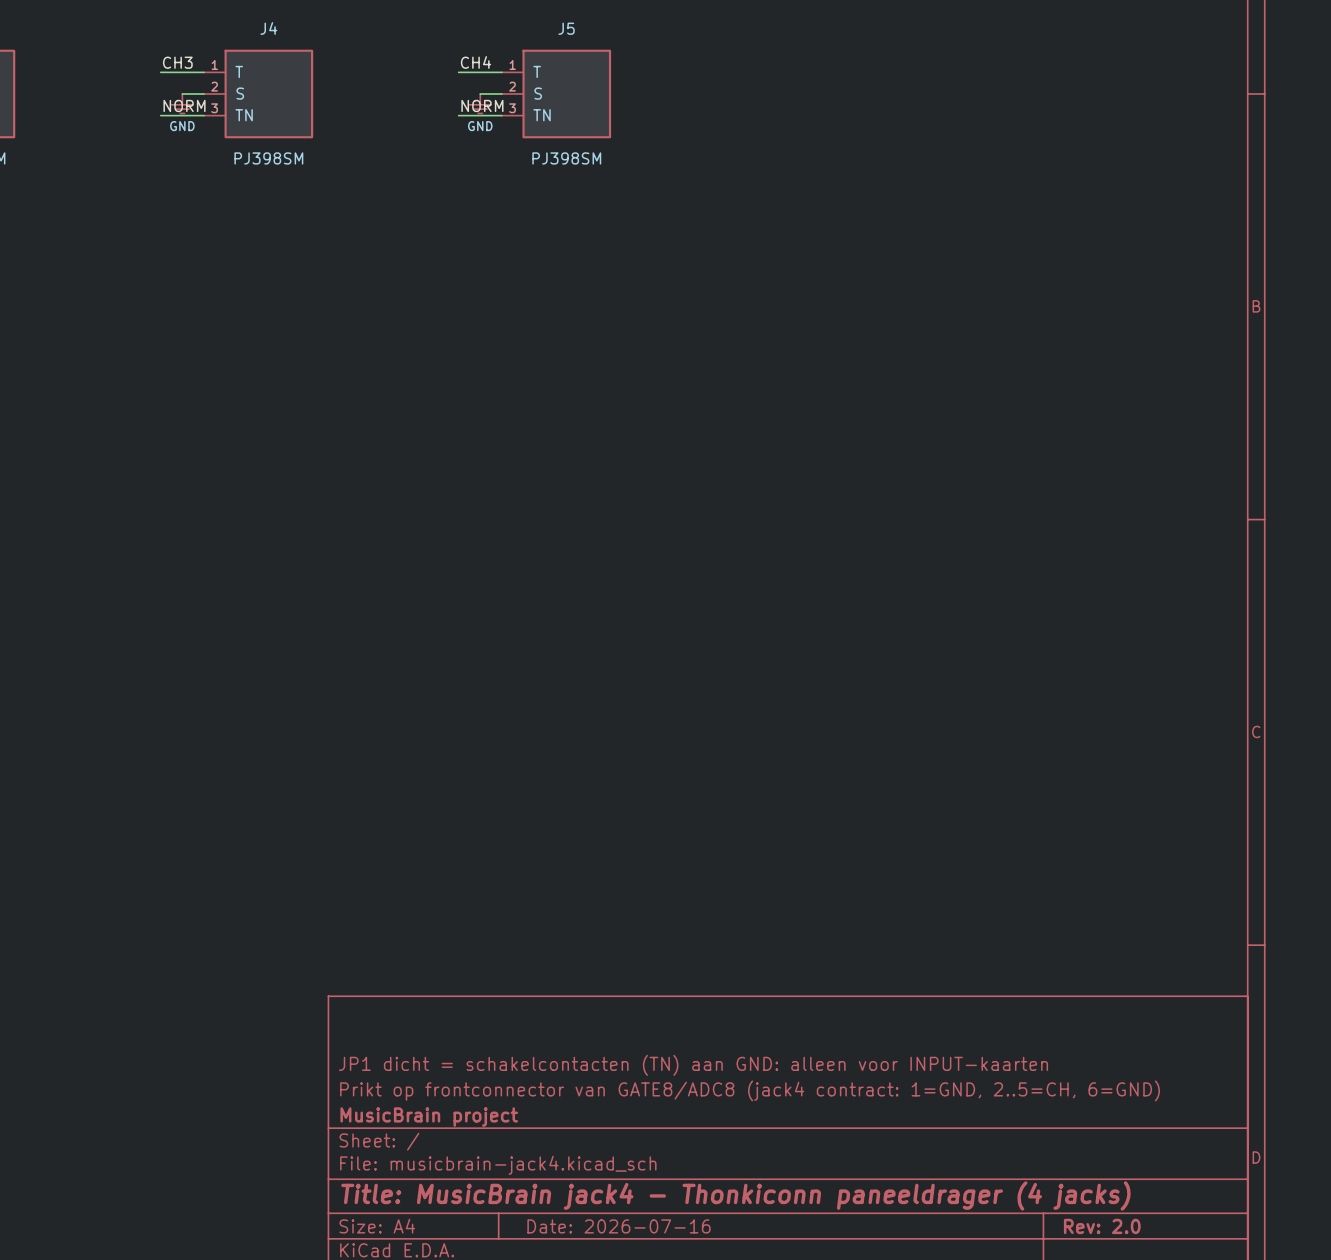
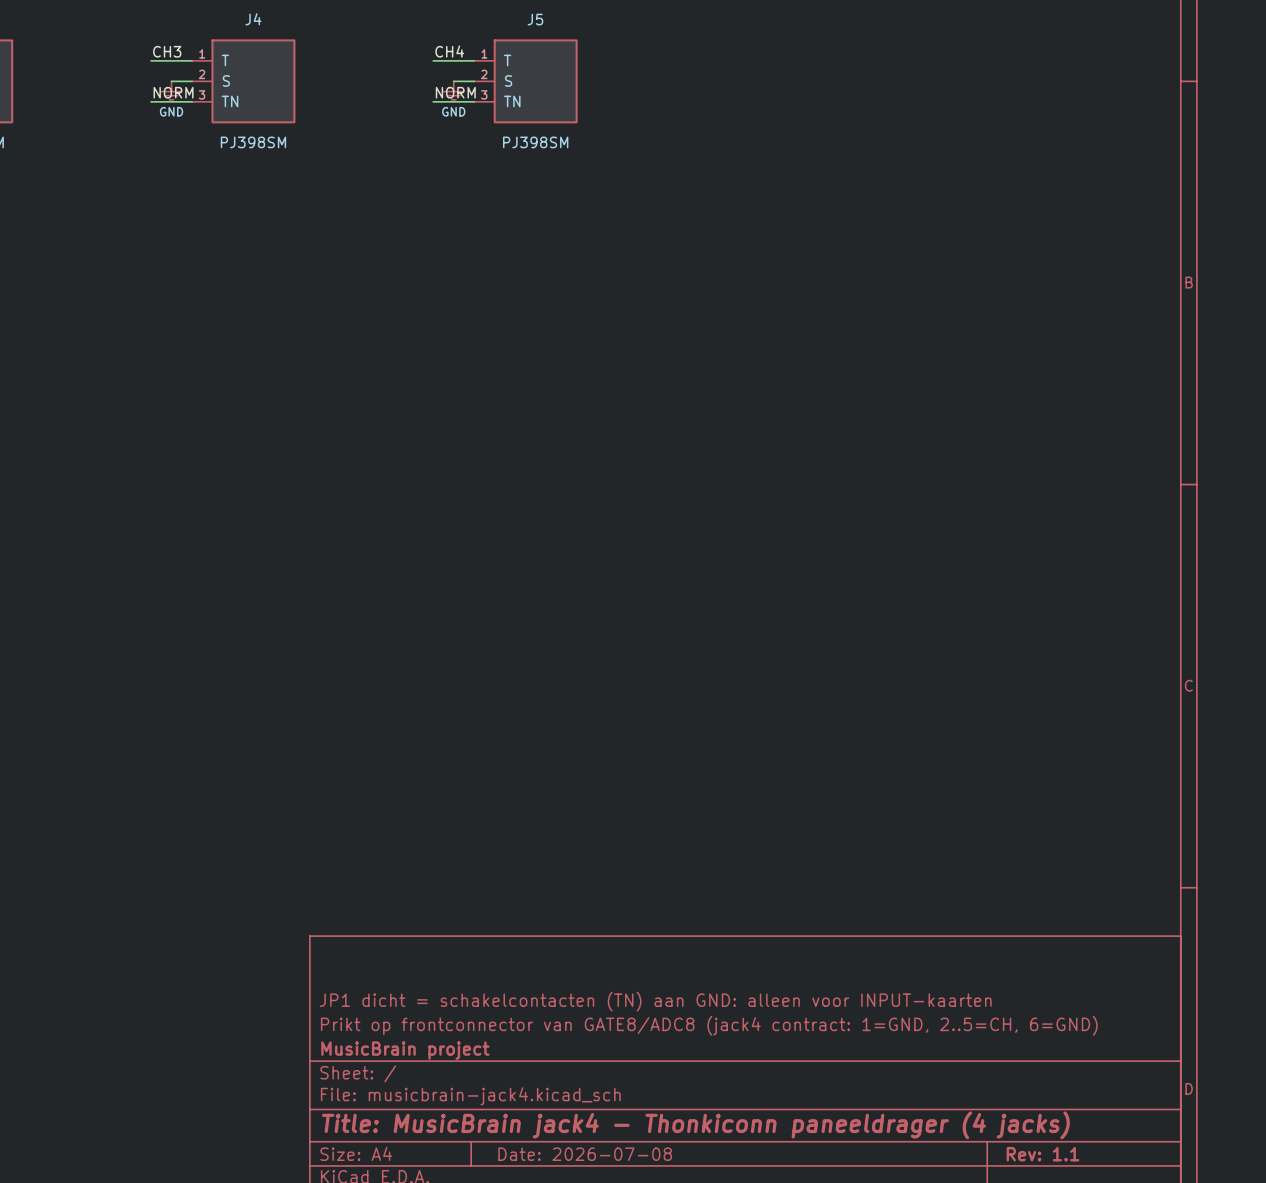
title block: Date: 2026-07-16 (619, 1226) -> Date: 2026-07-08 (585, 1154)
title block: Rev: 2.0 (1102, 1226) -> Rev: 1.1 (1042, 1154)

